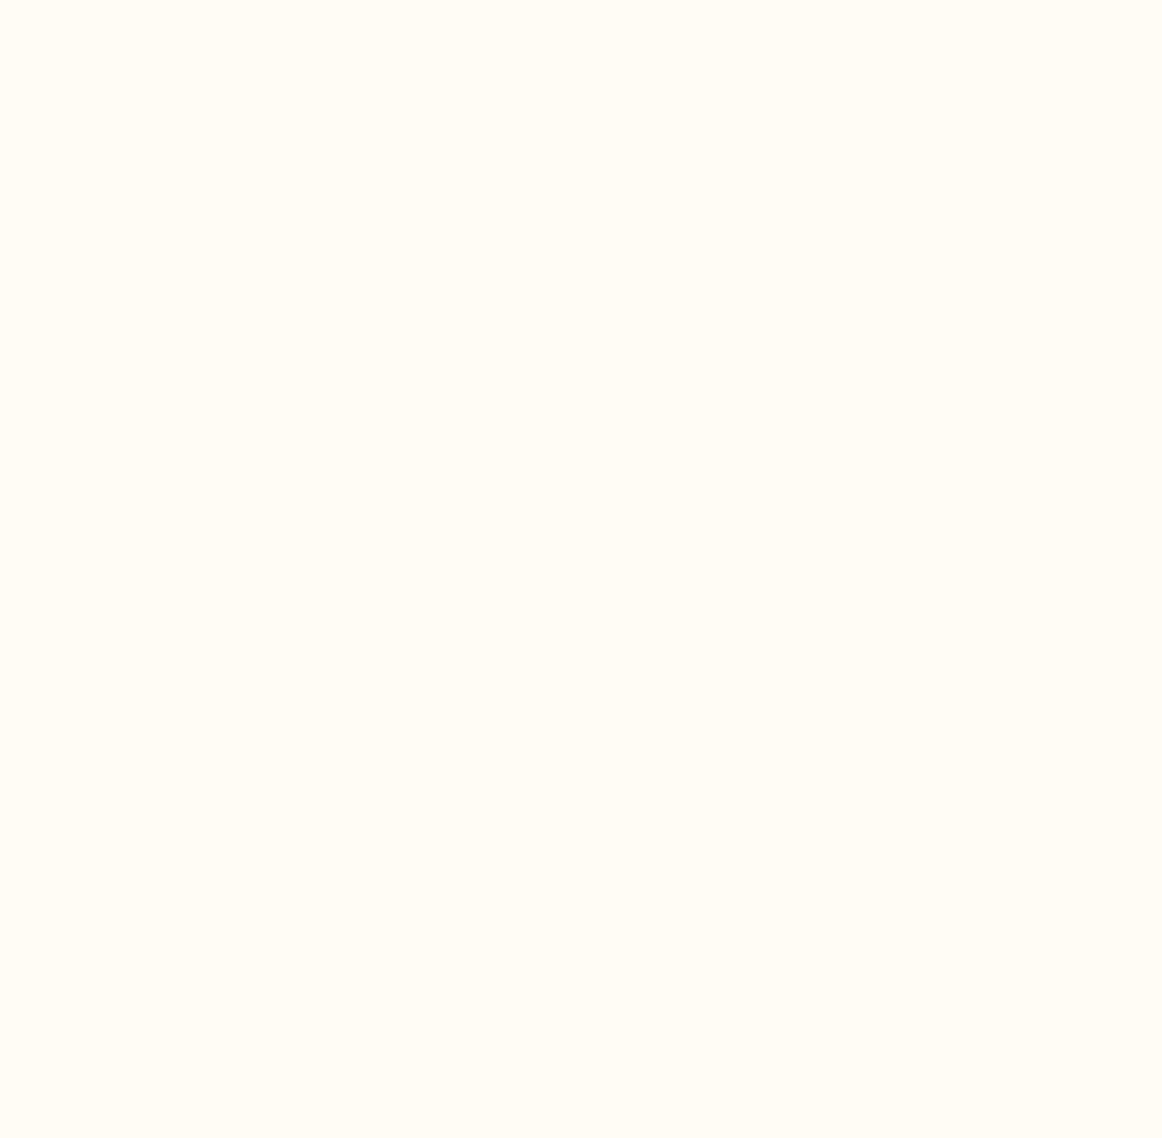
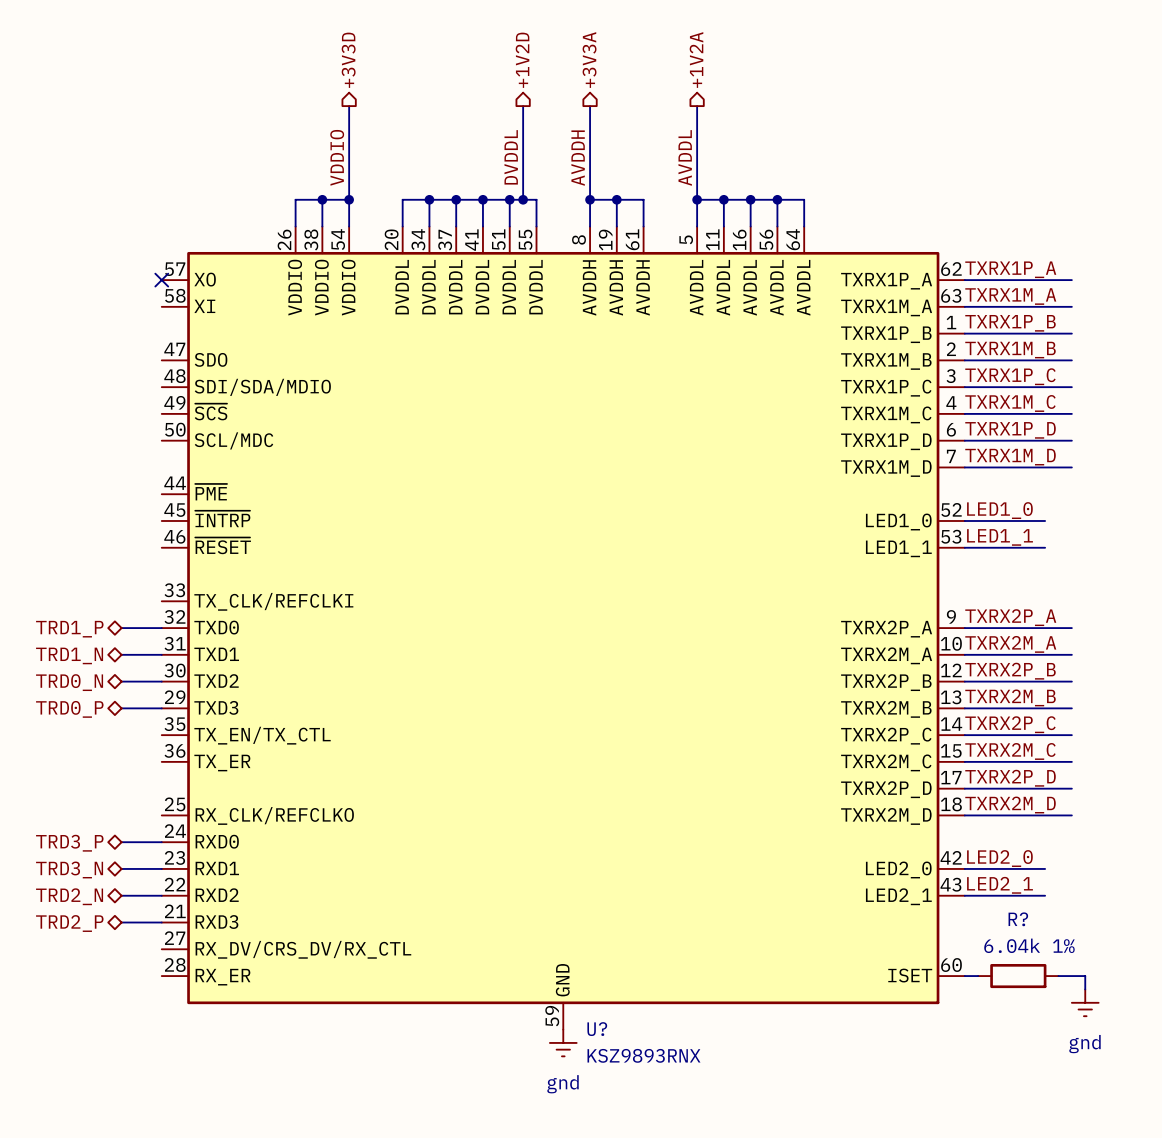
hierarchical label: none -> +3V3D (348, 60)
hierarchical label: none -> +1V2D (522, 60)
hierarchical label: none -> +3V3A (589, 60)
hierarchical label: none -> +1V2A (696, 60)
wire: none -> (349, 106) (349, 226)
wire: none -> (523, 106) (523, 199)
wire: none -> (590, 106) (590, 226)
wire: none -> (697, 106) (697, 226)
label: none -> VDDIO (337, 157)
label: none -> DVDDL (511, 157)
label: none -> AVDDL (685, 157)
label: none -> AVDDH (578, 158)
wire: none -> (322, 199) (322, 226)
junction: none -> (322, 199)
wire: none -> (349, 199) (295, 199) (295, 226)
junction: none -> (349, 199)
wire: none -> (429, 199) (429, 226)
junction: none -> (429, 199)
wire: none -> (456, 199) (456, 226)
junction: none -> (456, 199)
wire: none -> (482, 199) (482, 226)
junction: none -> (482, 199)
wire: none -> (509, 199) (509, 226)
junction: none -> (509, 199)
junction: none -> (523, 199)
wire: none -> (590, 199) (643, 199) (643, 226)
junction: none -> (590, 199)
wire: none -> (616, 199) (616, 226)
junction: none -> (616, 199)
wire: none -> (697, 199) (804, 199) (804, 226)
junction: none -> (697, 199)
wire: none -> (723, 199) (723, 226)
junction: none -> (723, 199)
wire: none -> (750, 199) (750, 226)
junction: none -> (750, 199)
wire: none -> (777, 199) (777, 226)
junction: none -> (777, 199)
wire: none -> (402, 226) (402, 199) (536, 199) (536, 226)
label: none -> TXRX1P_A (1010, 269)
no-connect mark: none -> (161, 280)
wire: none -> (964, 280) (1071, 280)
label: none -> TXRX1M_A (1010, 296)
wire: none -> (964, 306) (1071, 306)
label: none -> TXRX1P_B (1010, 323)
wire: none -> (964, 333) (1071, 333)
label: none -> TXRX1M_B (1010, 350)
wire: none -> (964, 360) (1071, 360)
label: none -> TXRX1P_C (1010, 376)
wire: none -> (964, 387) (1071, 387)
label: none -> TXRX1M_C (1010, 403)
wire: none -> (964, 413) (1071, 413)
label: none -> TXRX1P_D (1010, 430)
wire: none -> (964, 440) (1071, 440)
label: none -> TXRX1M_D (1010, 457)
wire: none -> (964, 467) (1071, 467)
label: none -> LED1_0 (999, 510)
wire: none -> (964, 520) (1045, 520)
label: none -> LED1_1 (1000, 537)
wire: none -> (964, 547) (1045, 547)
label: none -> TXRX2P_A (1010, 617)
wire: none -> (121, 628) (161, 628)
U?: none -> KSZ9893RNX (563, 628)
wire: none -> (964, 628) (1071, 628)
hierarchical label: none -> TRD1_P (69, 629)
label: none -> TXRX2M_A (1010, 644)
wire: none -> (121, 654) (161, 654)
wire: none -> (964, 654) (1071, 654)
hierarchical label: none -> TRD1_N (69, 655)
label: none -> TXRX2P_B (1010, 671)
wire: none -> (121, 681) (161, 681)
wire: none -> (964, 681) (1071, 681)
hierarchical label: none -> TRD0_N (69, 682)
label: none -> TXRX2M_B (1010, 697)
wire: none -> (121, 708) (161, 708)
wire: none -> (964, 708) (1071, 708)
hierarchical label: none -> TRD0_P (69, 709)
label: none -> TXRX2P_C (1010, 724)
wire: none -> (964, 735) (1071, 735)
label: none -> TXRX2M_C (1010, 751)
wire: none -> (964, 761) (1071, 761)
label: none -> TXRX2P_D (1010, 778)
wire: none -> (964, 788) (1071, 788)
label: none -> TXRX2M_D (1010, 805)
wire: none -> (964, 815) (1071, 815)
wire: none -> (121, 842) (161, 842)
hierarchical label: none -> TRD3_P (69, 843)
label: none -> LED2_0 (999, 858)
wire: none -> (121, 868) (161, 868)
wire: none -> (964, 868) (1045, 868)
hierarchical label: none -> TRD3_N (69, 869)
label: none -> LED2_1 (1000, 885)
wire: none -> (121, 895) (161, 895)
wire: none -> (964, 895) (1045, 895)
hierarchical label: none -> TRD2_N (69, 896)
wire: none -> (121, 922) (161, 922)
hierarchical label: none -> TRD2_P (69, 923)
wire: none -> (964, 976) (978, 976)
R?: none -> 6.04k 1% (1018, 976)
wire: none -> (1058, 976) (1085, 976) (1085, 989)
power symbol: none -> gnd (1085, 1002)
power symbol: none -> gnd (563, 1042)

